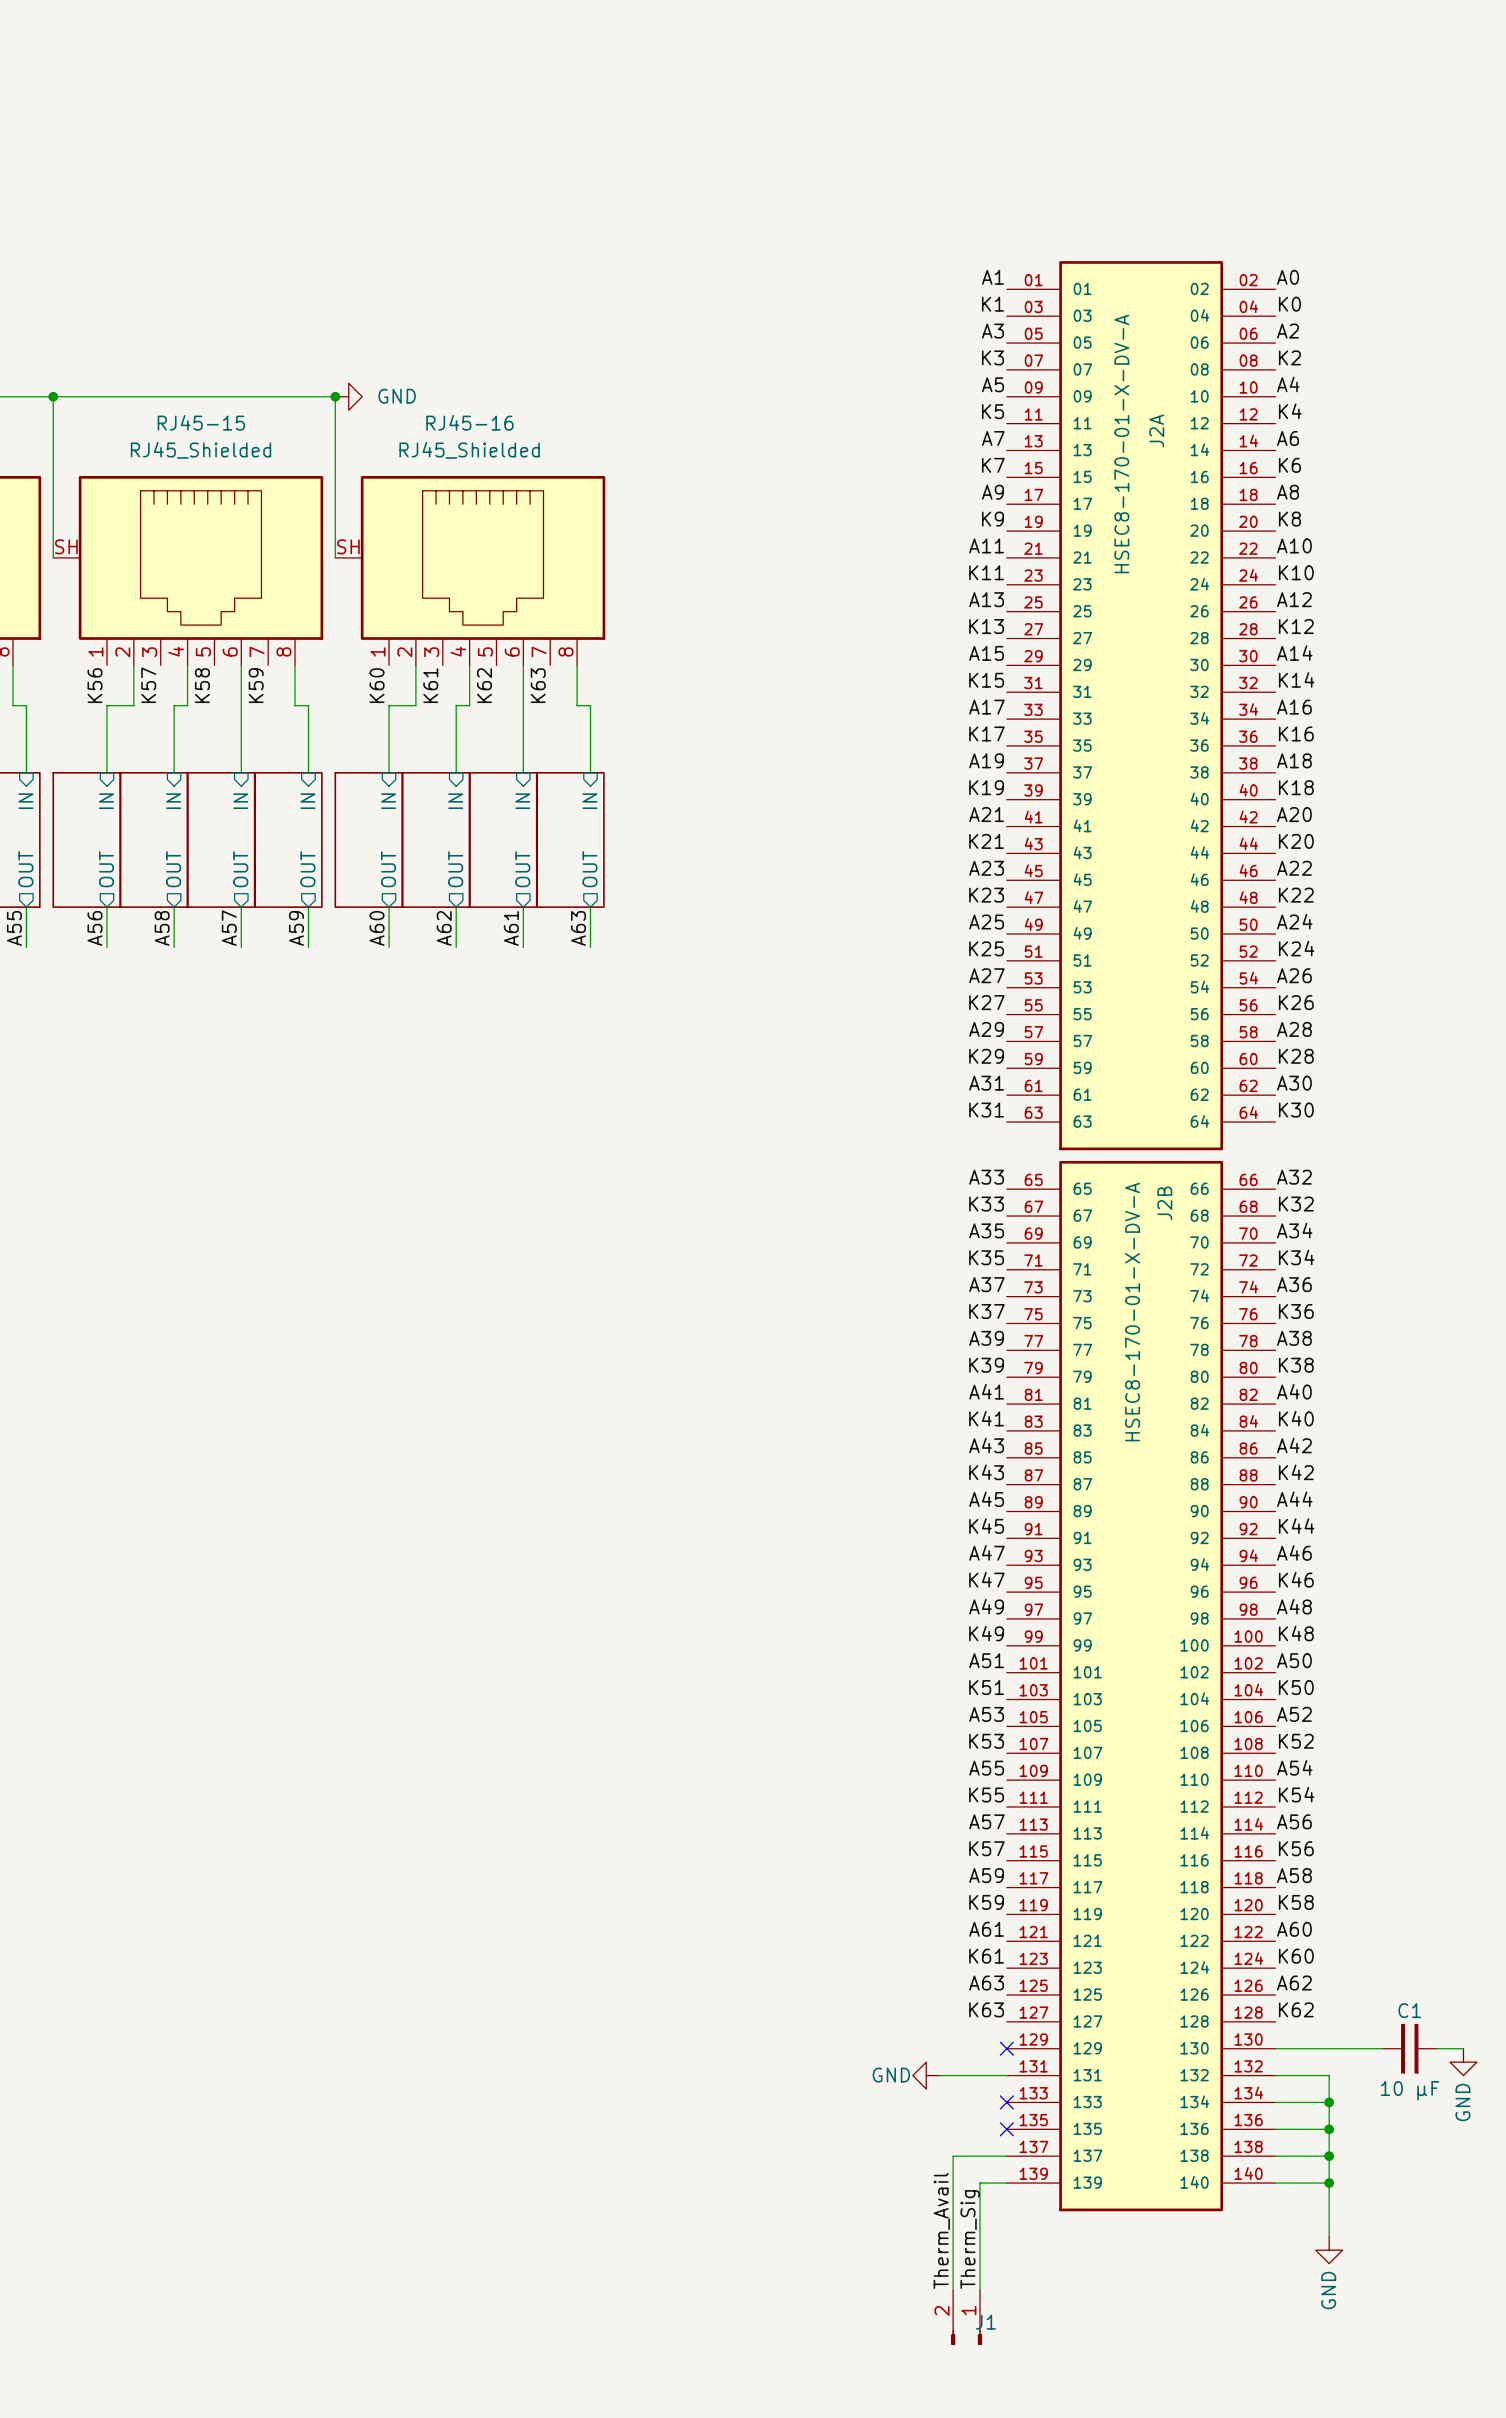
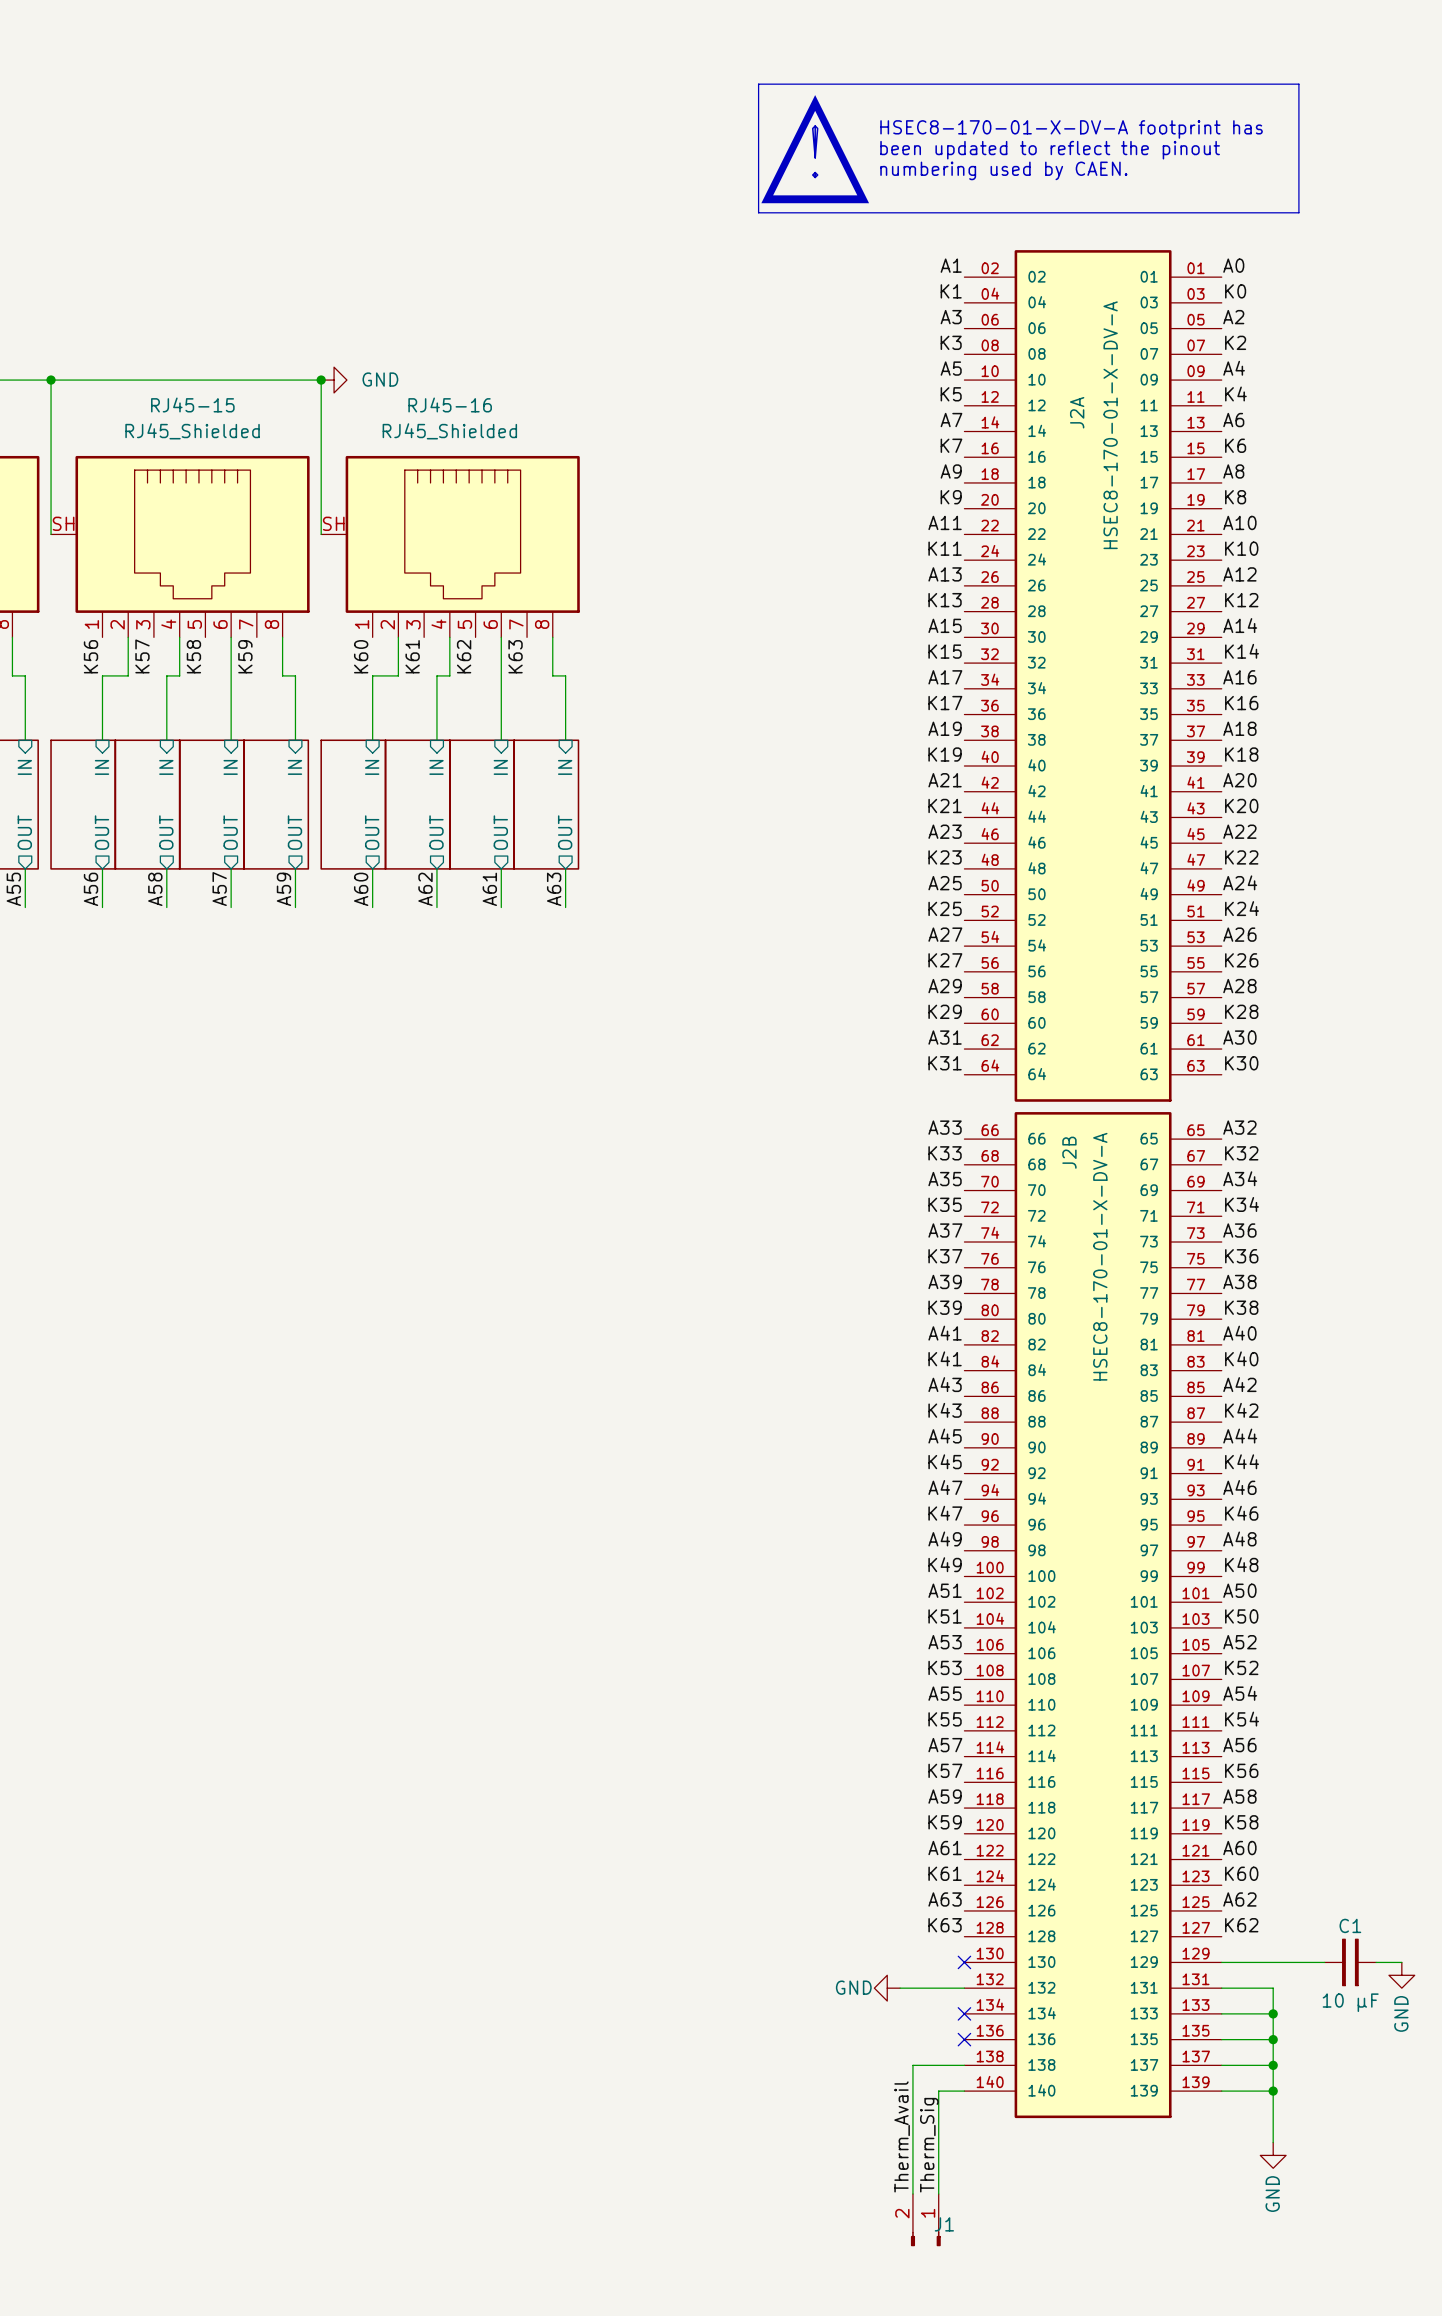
line: none -> (758, 84) (1298, 84) (1298, 212) (758, 212) (758, 84)
text: none -> HSEC8-170-01-X-DV-A footprint has (1071, 129)
text: none -> △ (815, 149)
text: none -> been updated to reflect the pinout (1050, 150)
text: none -> ! (815, 151)
text: none -> numbering used by CAEN. (1003, 170)
J2A flip: as is (1141, 705) -> left-right (1093, 675)
J2B flip: as is (1141, 1686) -> left-right (1093, 1615)

